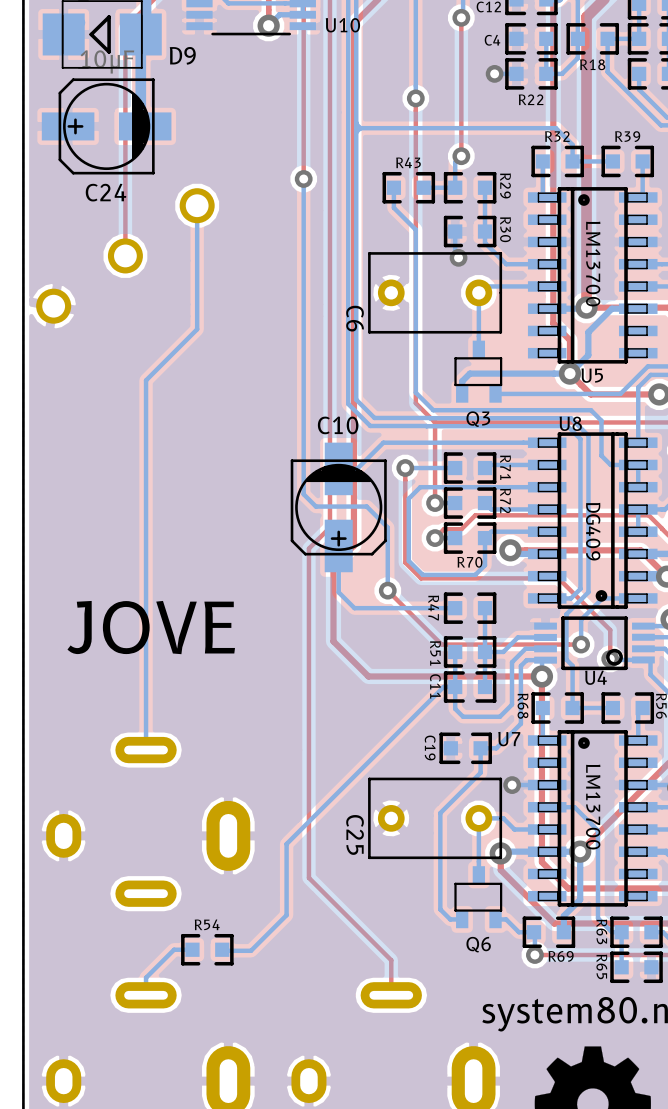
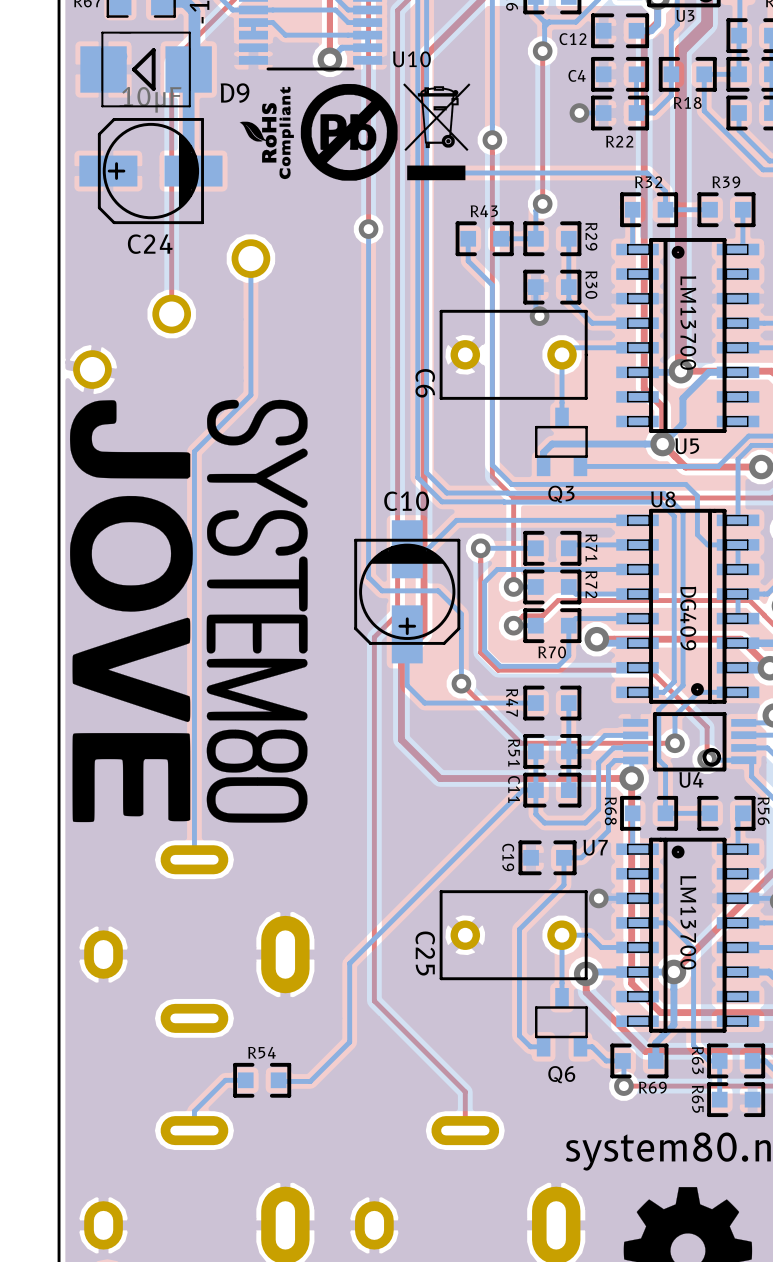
drawing: none -> [239, 83, 471, 181]
drawing: none -> [69, 399, 308, 823]
text: JOVE (151, 627) -> none

